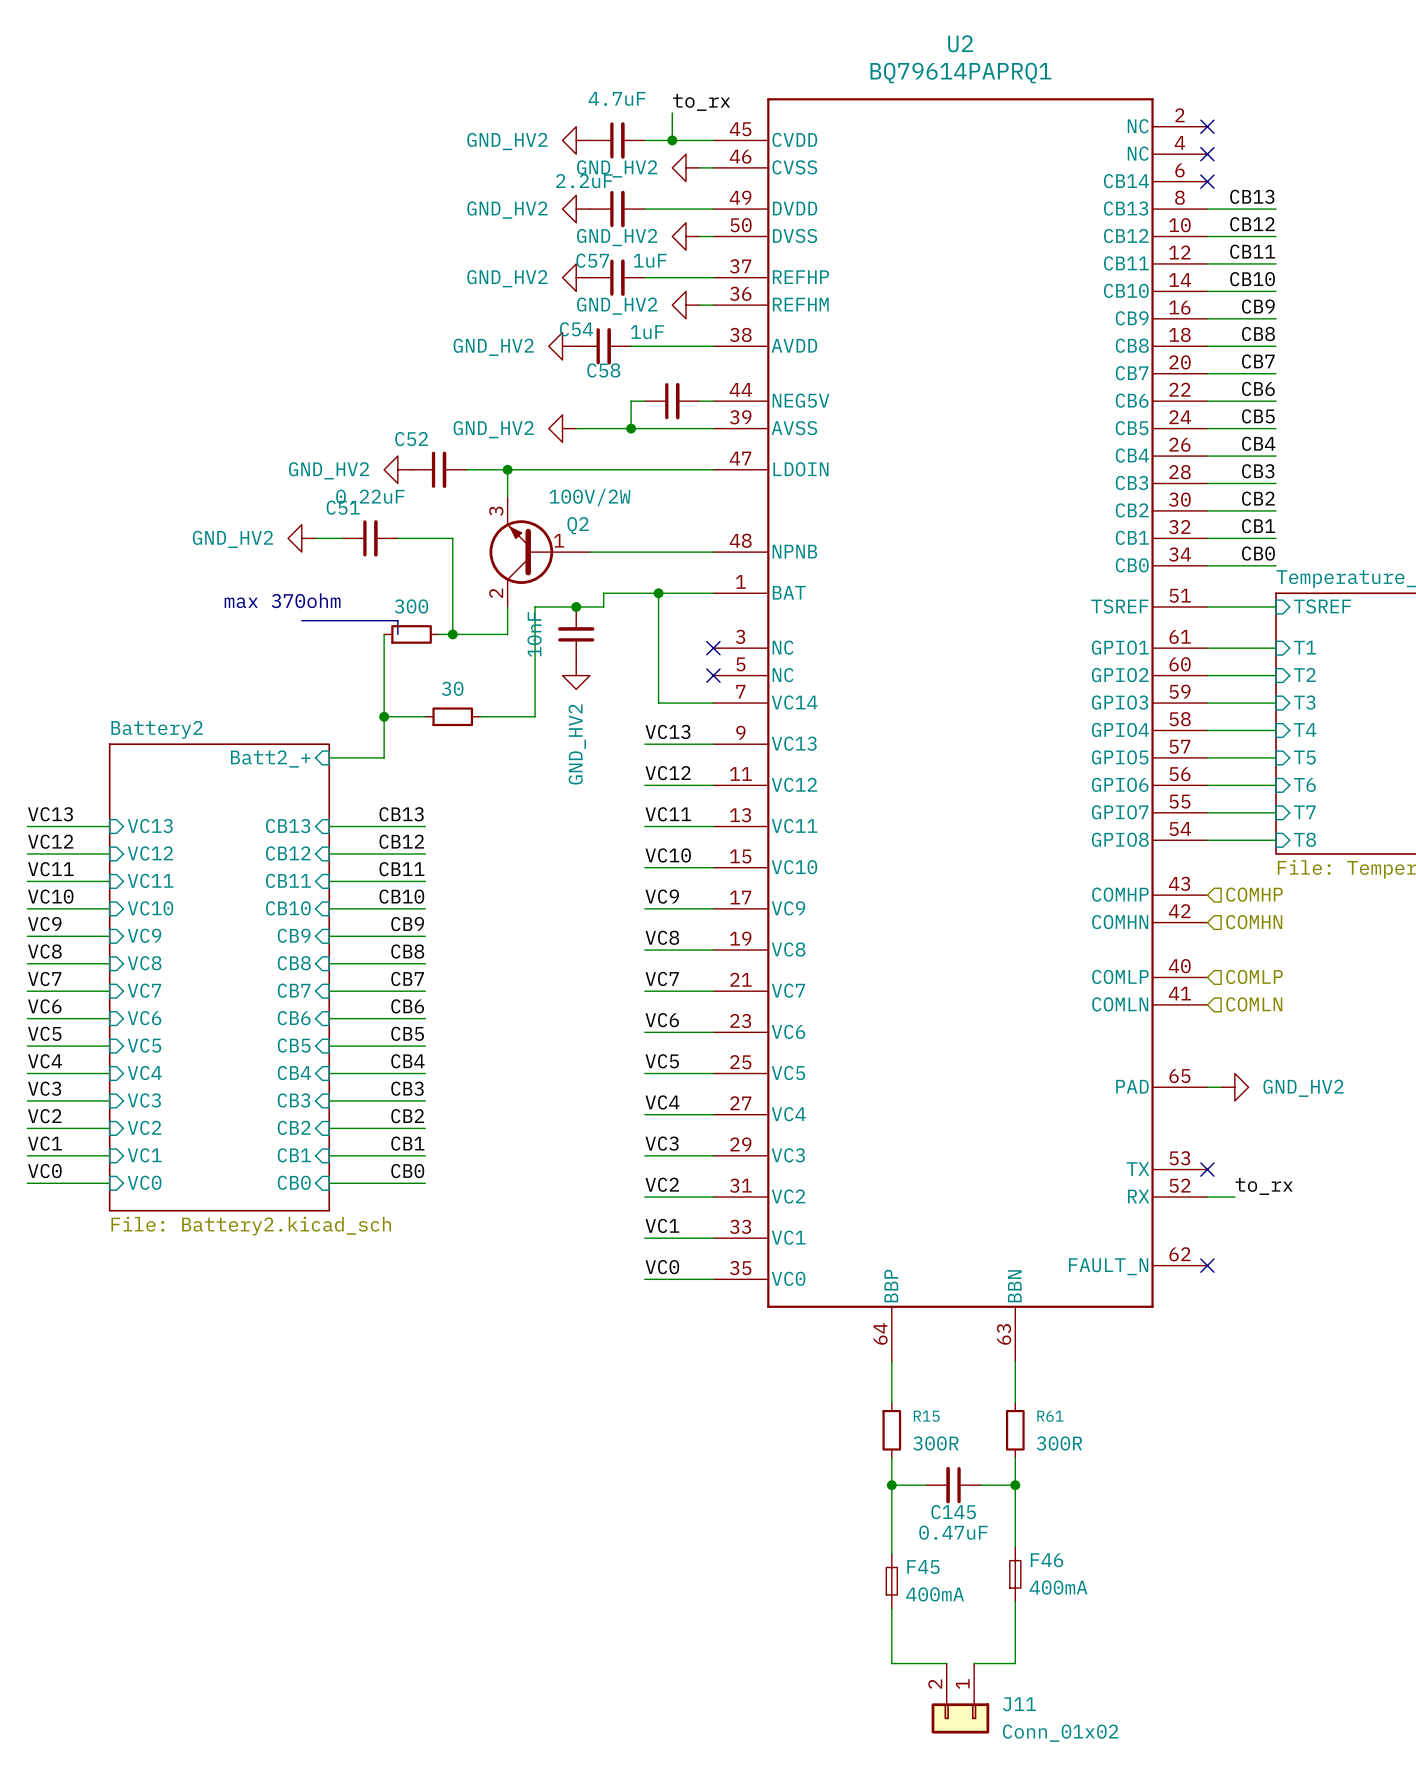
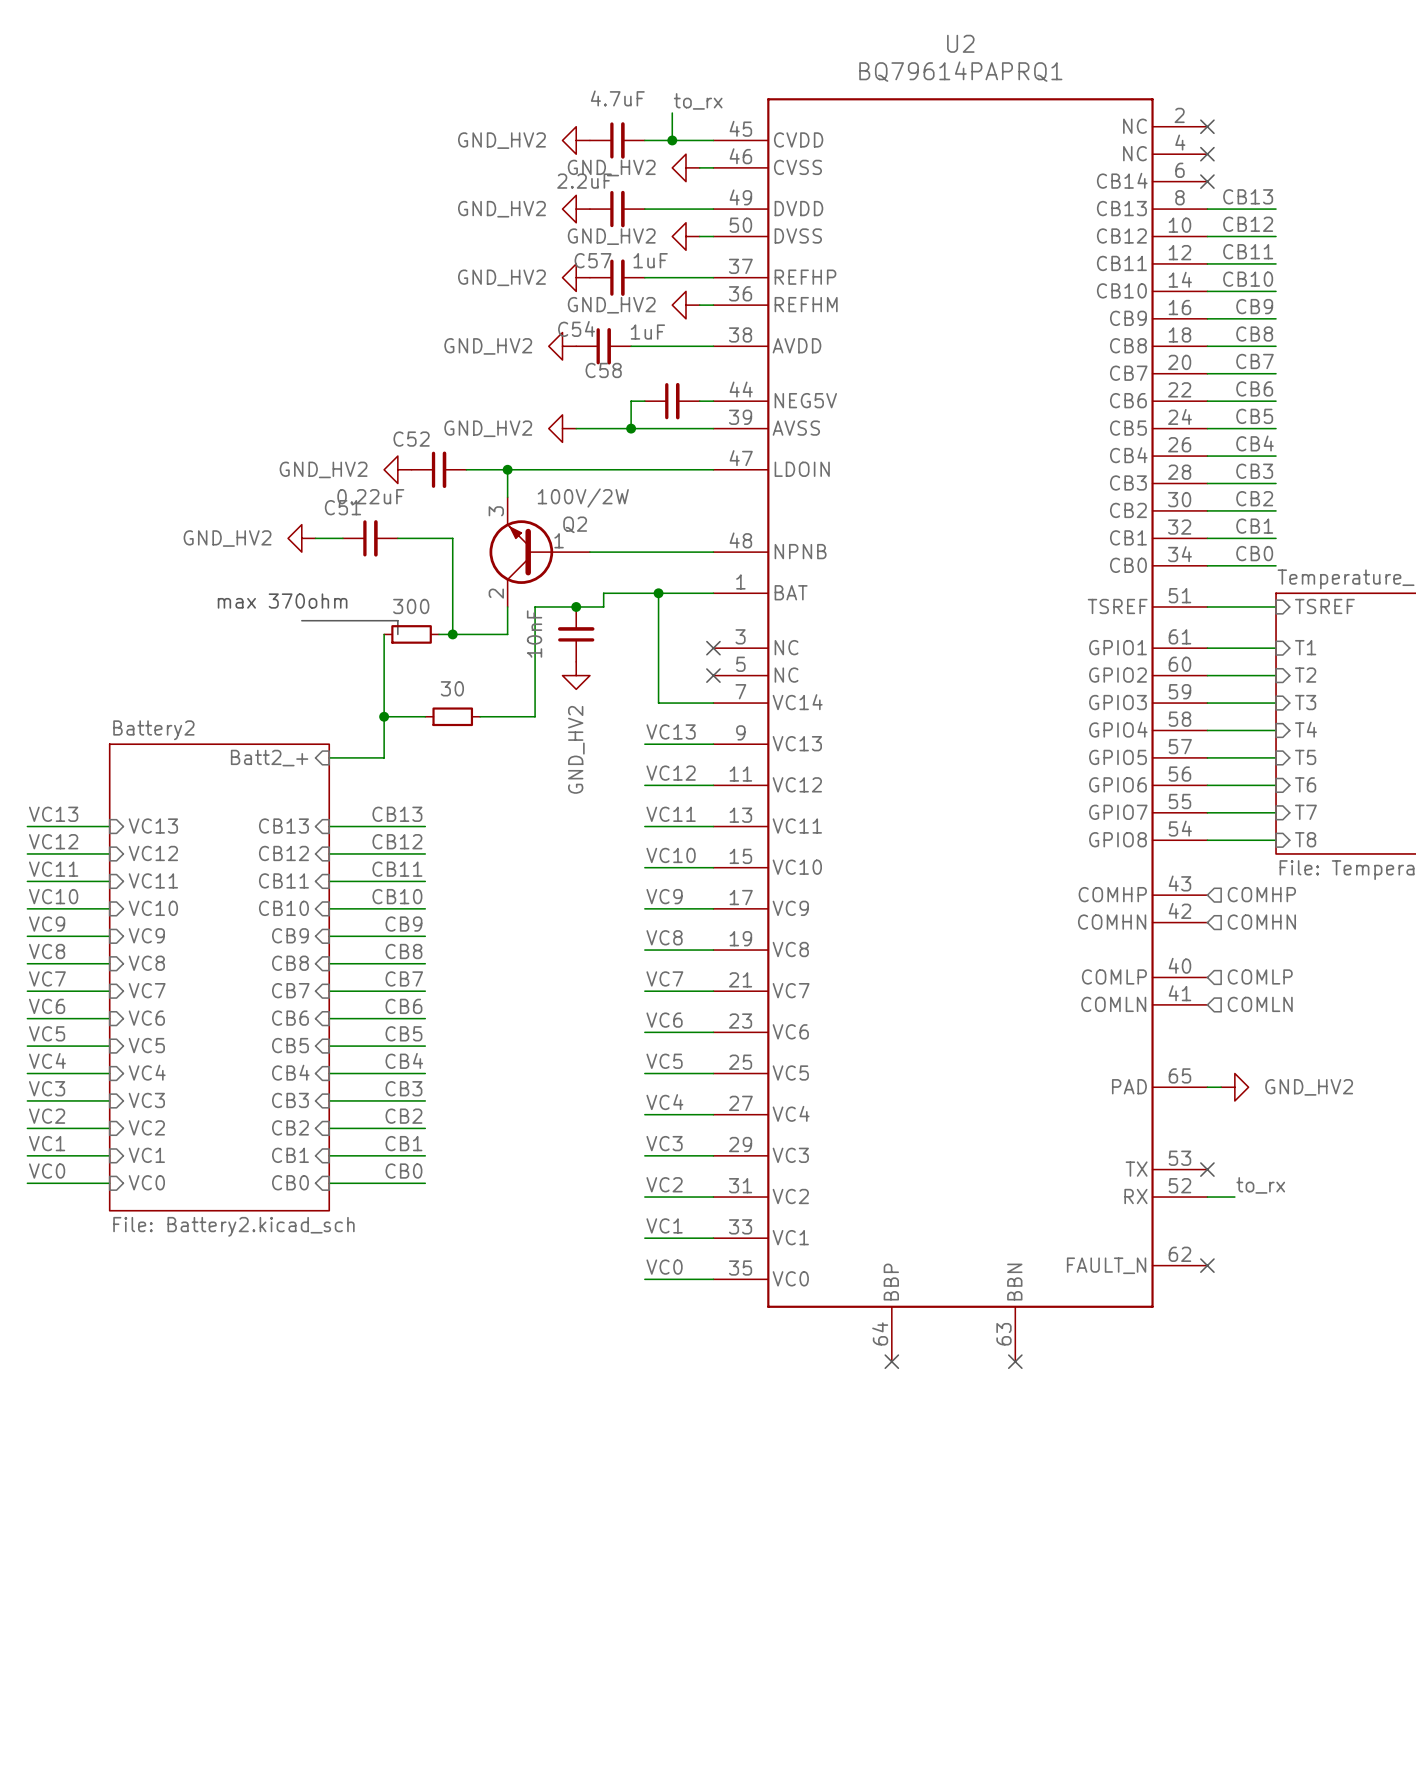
wire: (891, 1361) (891, 1402) -> none
no-connect mark: none -> (891, 1361)
wire: (1015, 1361) (1015, 1402) -> none
no-connect mark: none -> (1015, 1361)
R15: 300R (891, 1430) -> none
R61: 300R (1015, 1430) -> none
wire: (891, 1457) (891, 1553) -> none
wire: (1015, 1457) (1015, 1546) -> none
wire: (891, 1485) (926, 1485) -> none
junction: (891, 1485) -> none
C145: 0.47uF (953, 1485) -> none
wire: (981, 1485) (1015, 1485) -> none
junction: (1015, 1485) -> none
F46: 400mA (1015, 1574) -> none
F45: 400mA (891, 1581) -> none
wire: (1015, 1601) (1015, 1663) (974, 1663) -> none
wire: (891, 1608) (891, 1663) (946, 1663) -> none
J11: Conn_01x02 (960, 1698) -> none

